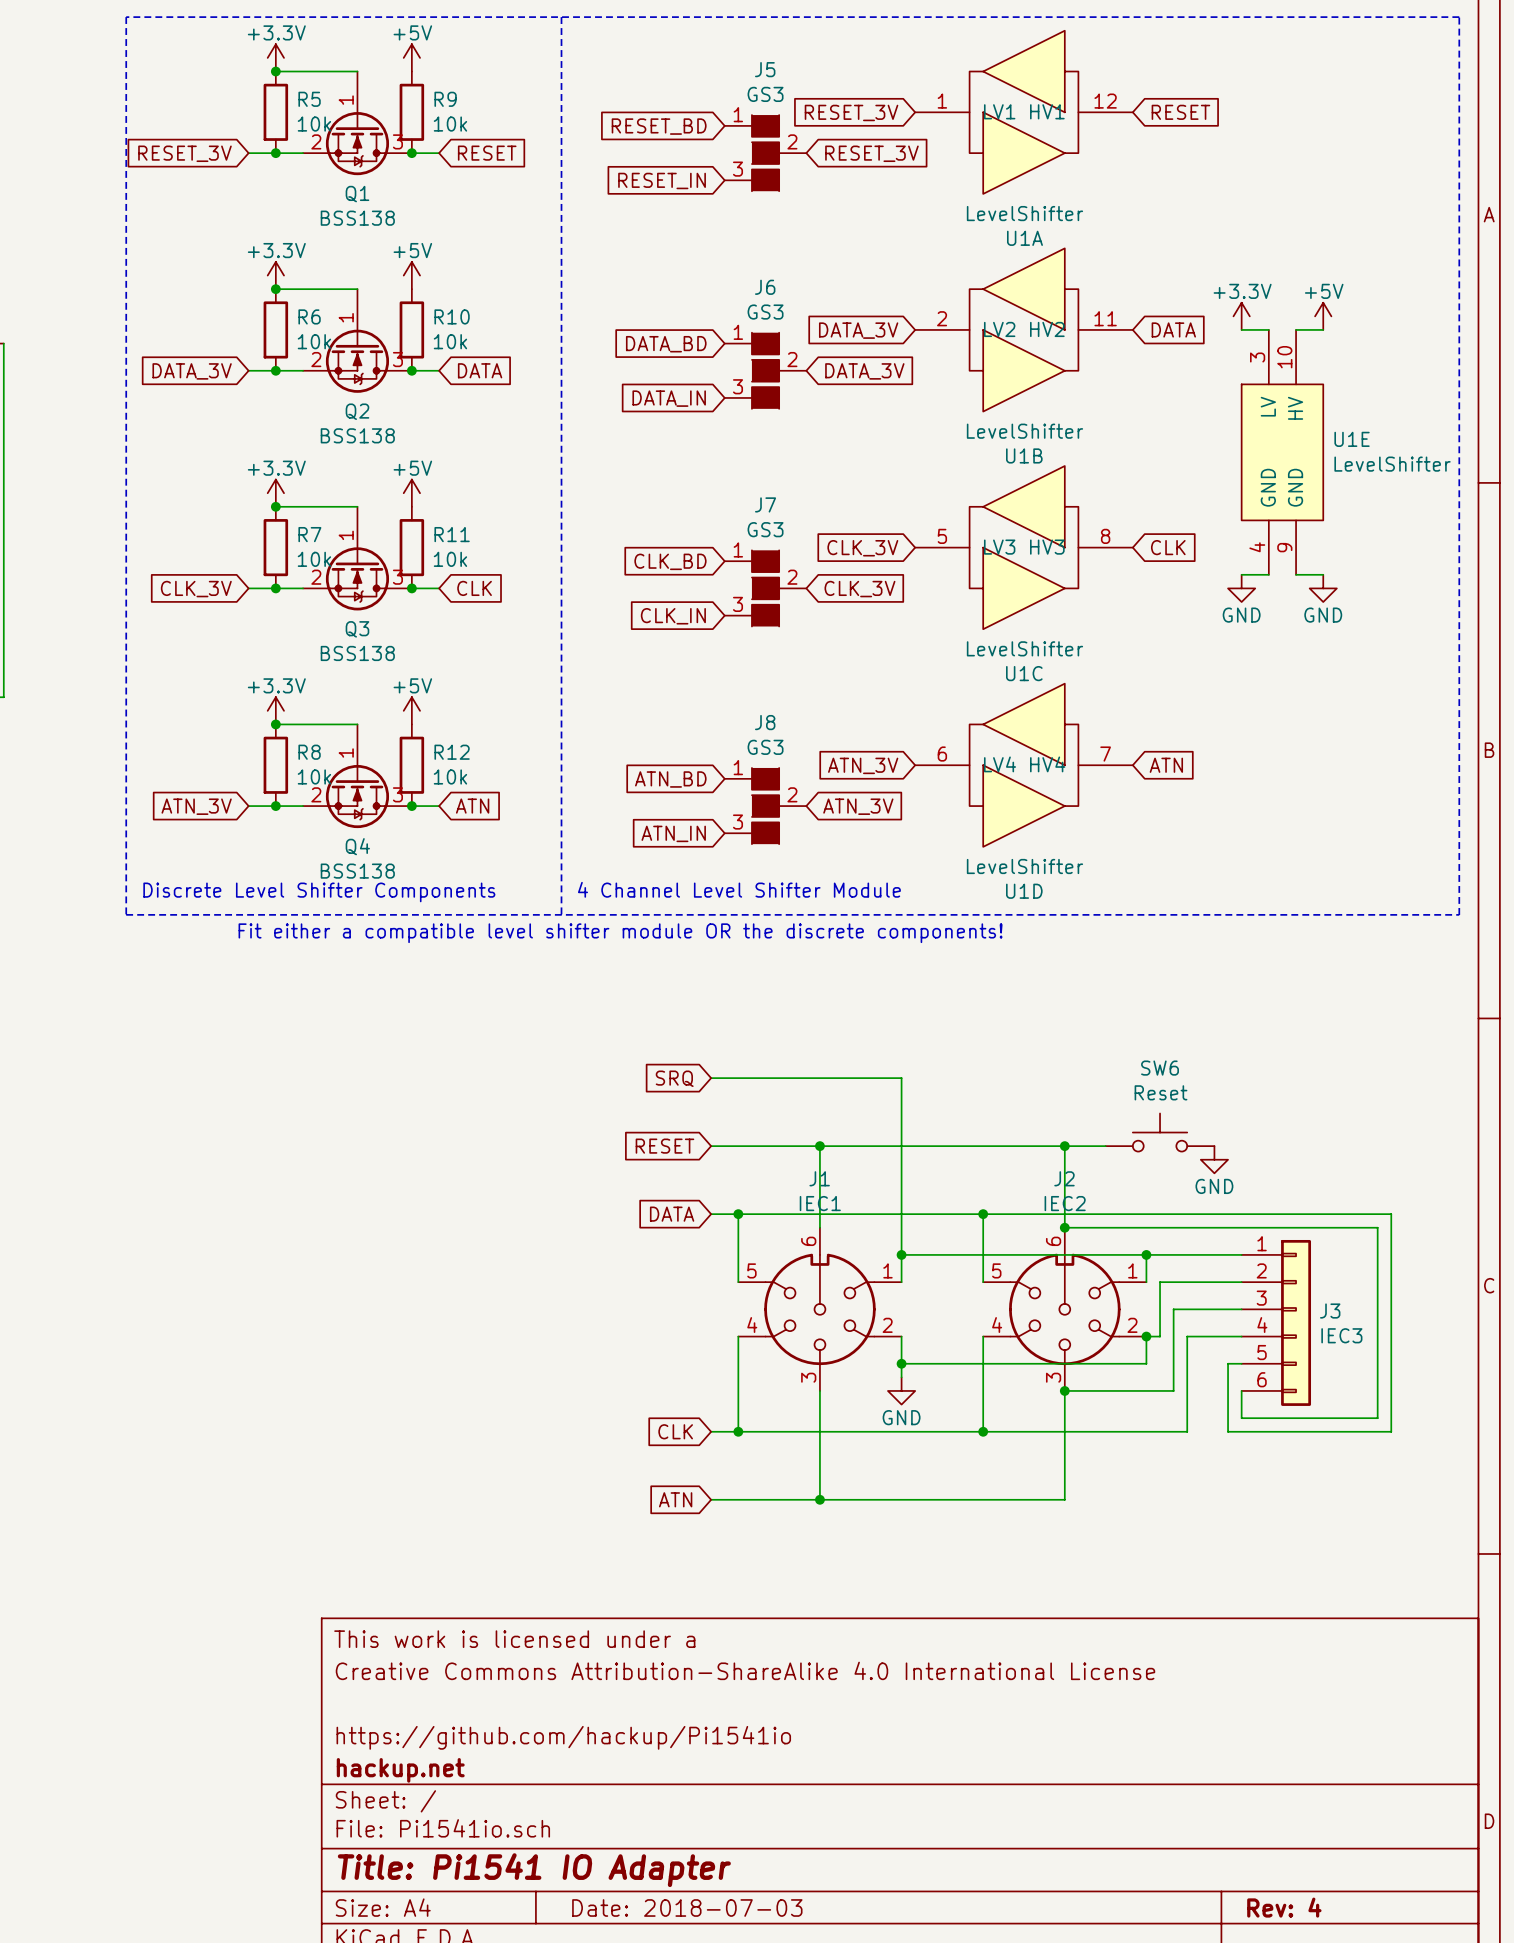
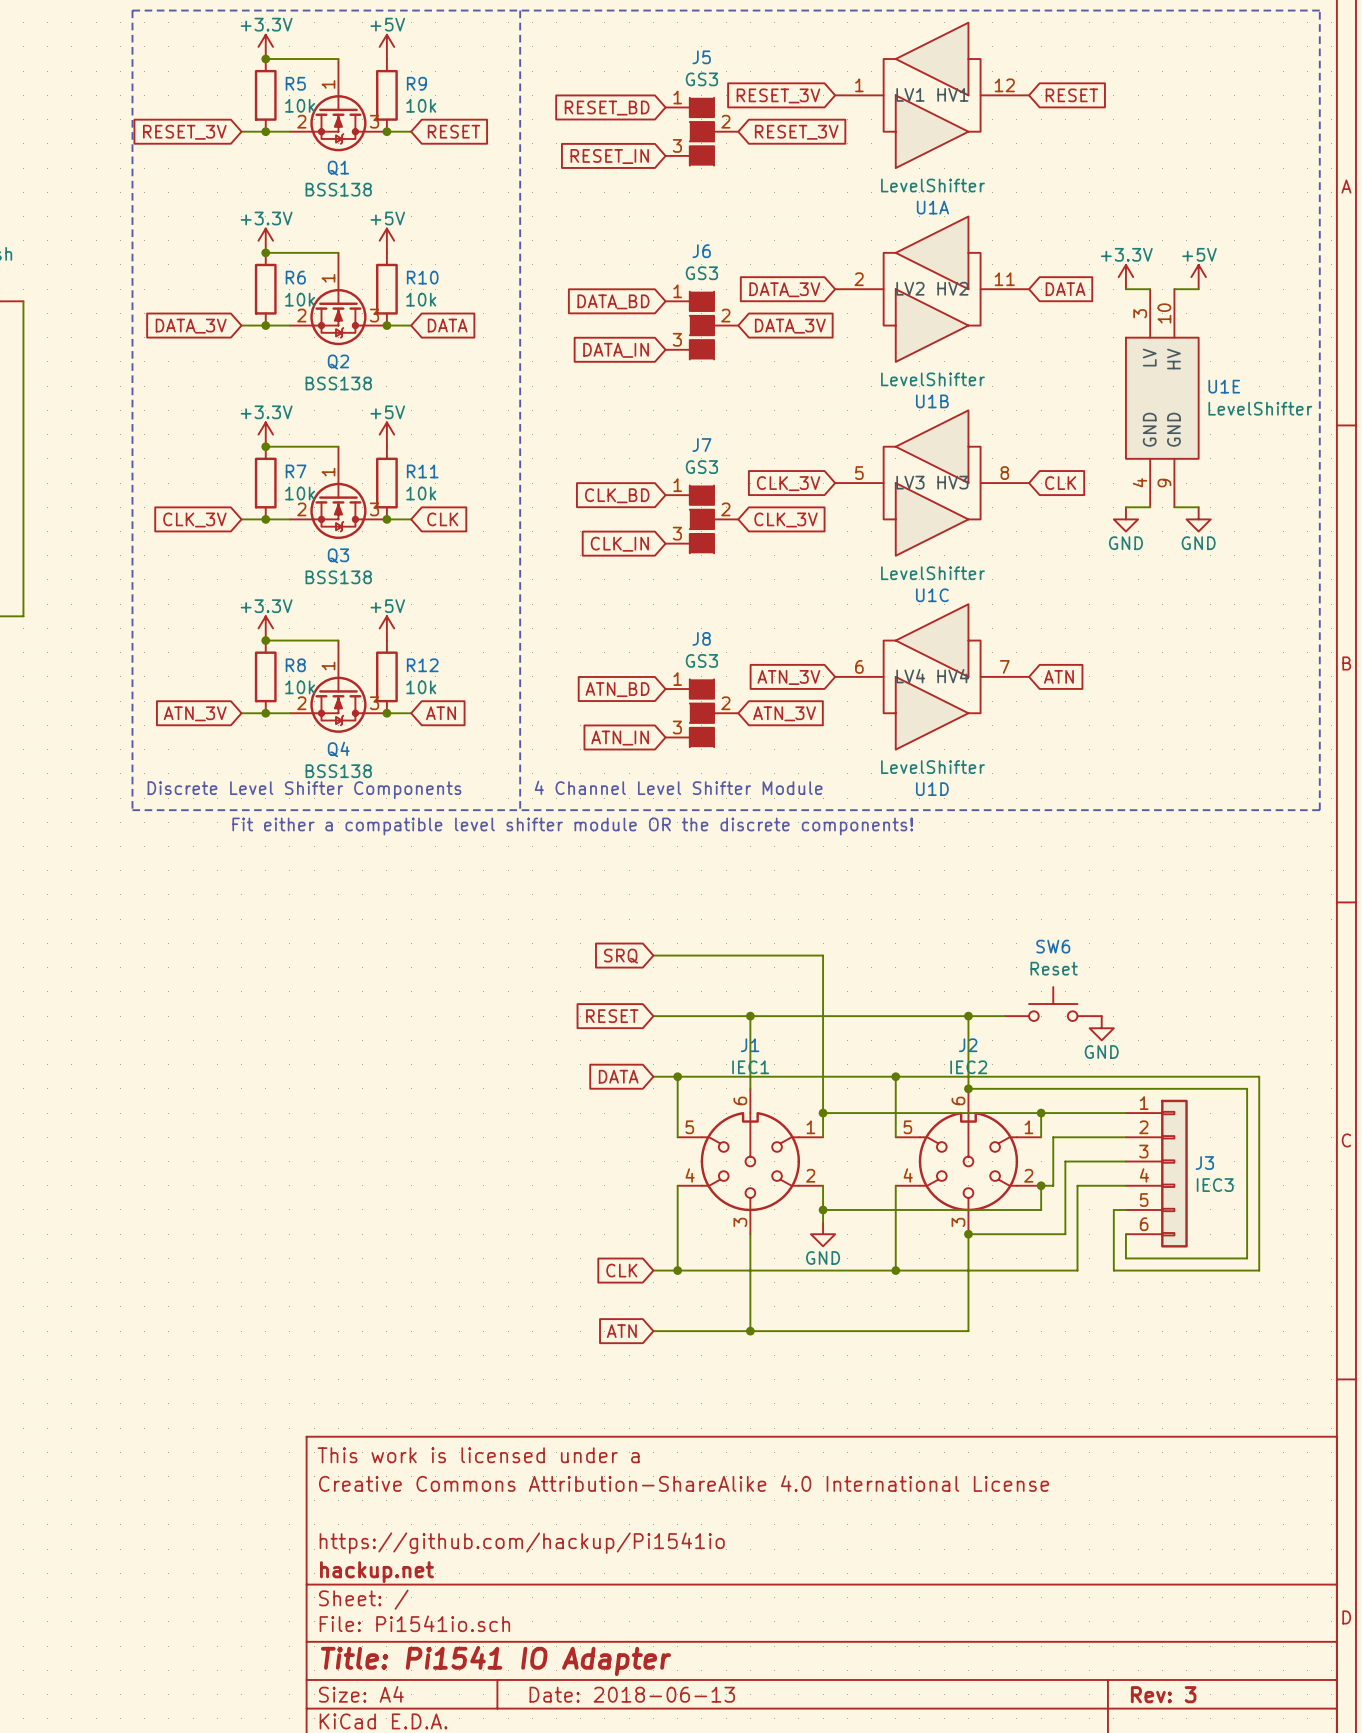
title block: Date: 2018-07-03 (687, 1907) -> Date: 2018-06-13 (632, 1694)
title block: Rev: 4 (1284, 1907) -> Rev: 3 (1163, 1694)

